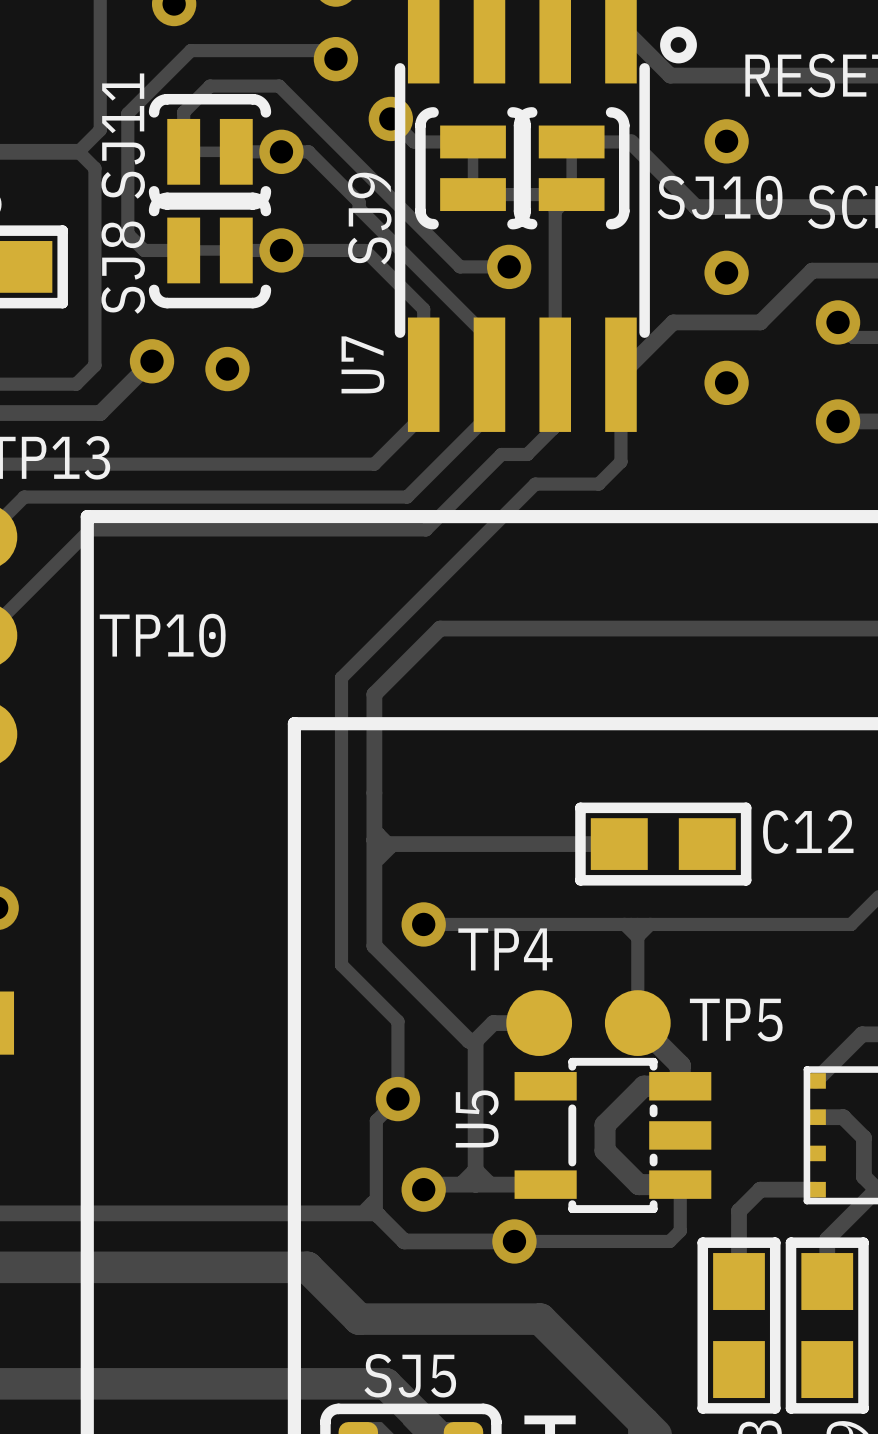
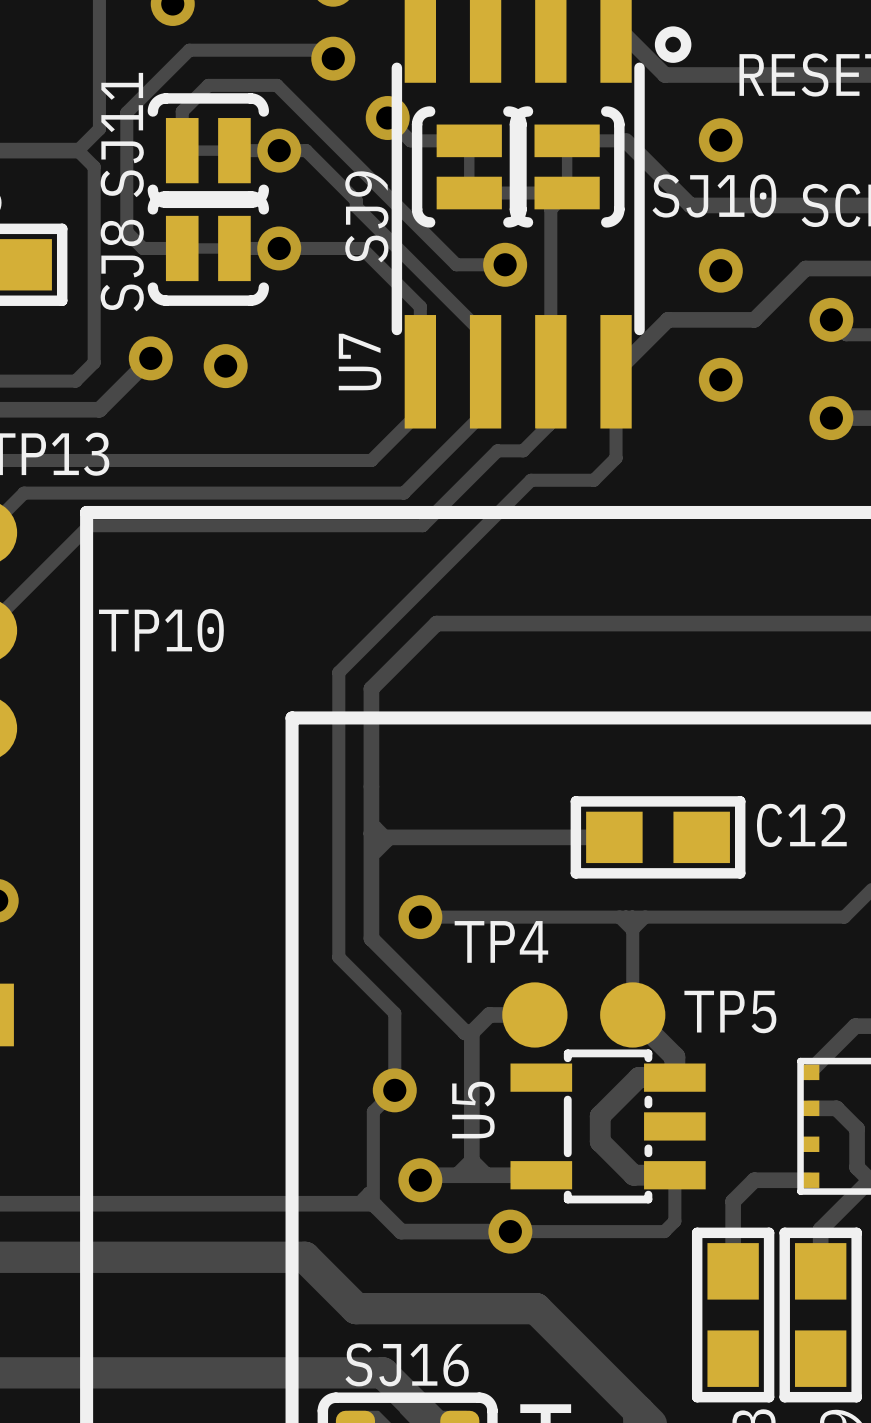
SJ5 name: SJ5 (410, 1375) -> SJ16 (407, 1364)

